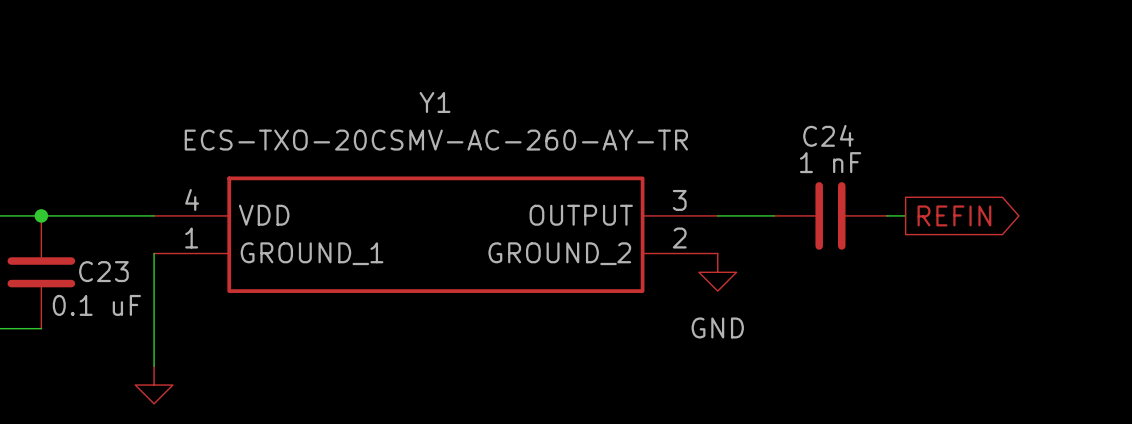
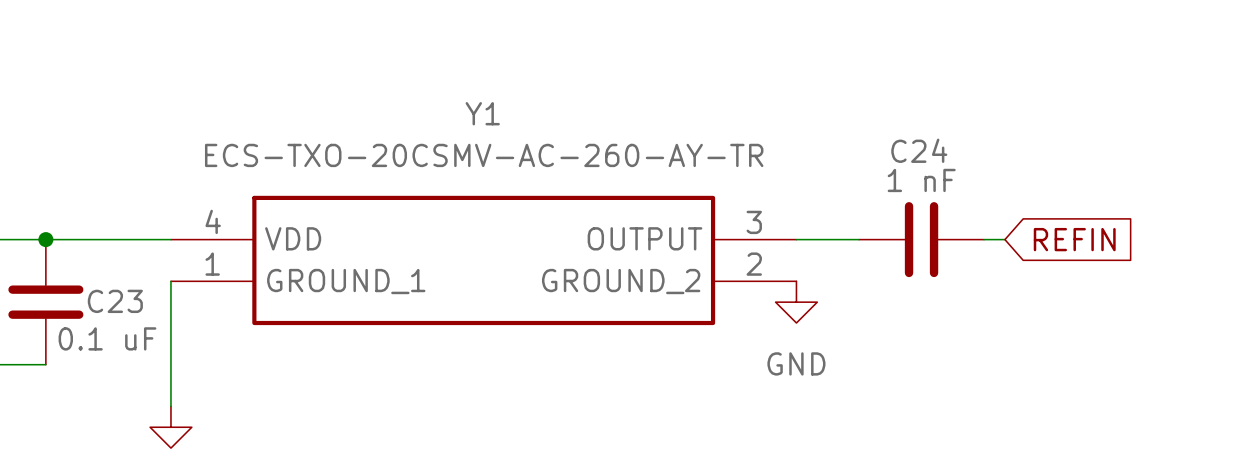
global label shape: output (954, 215) -> input (1074, 239)

